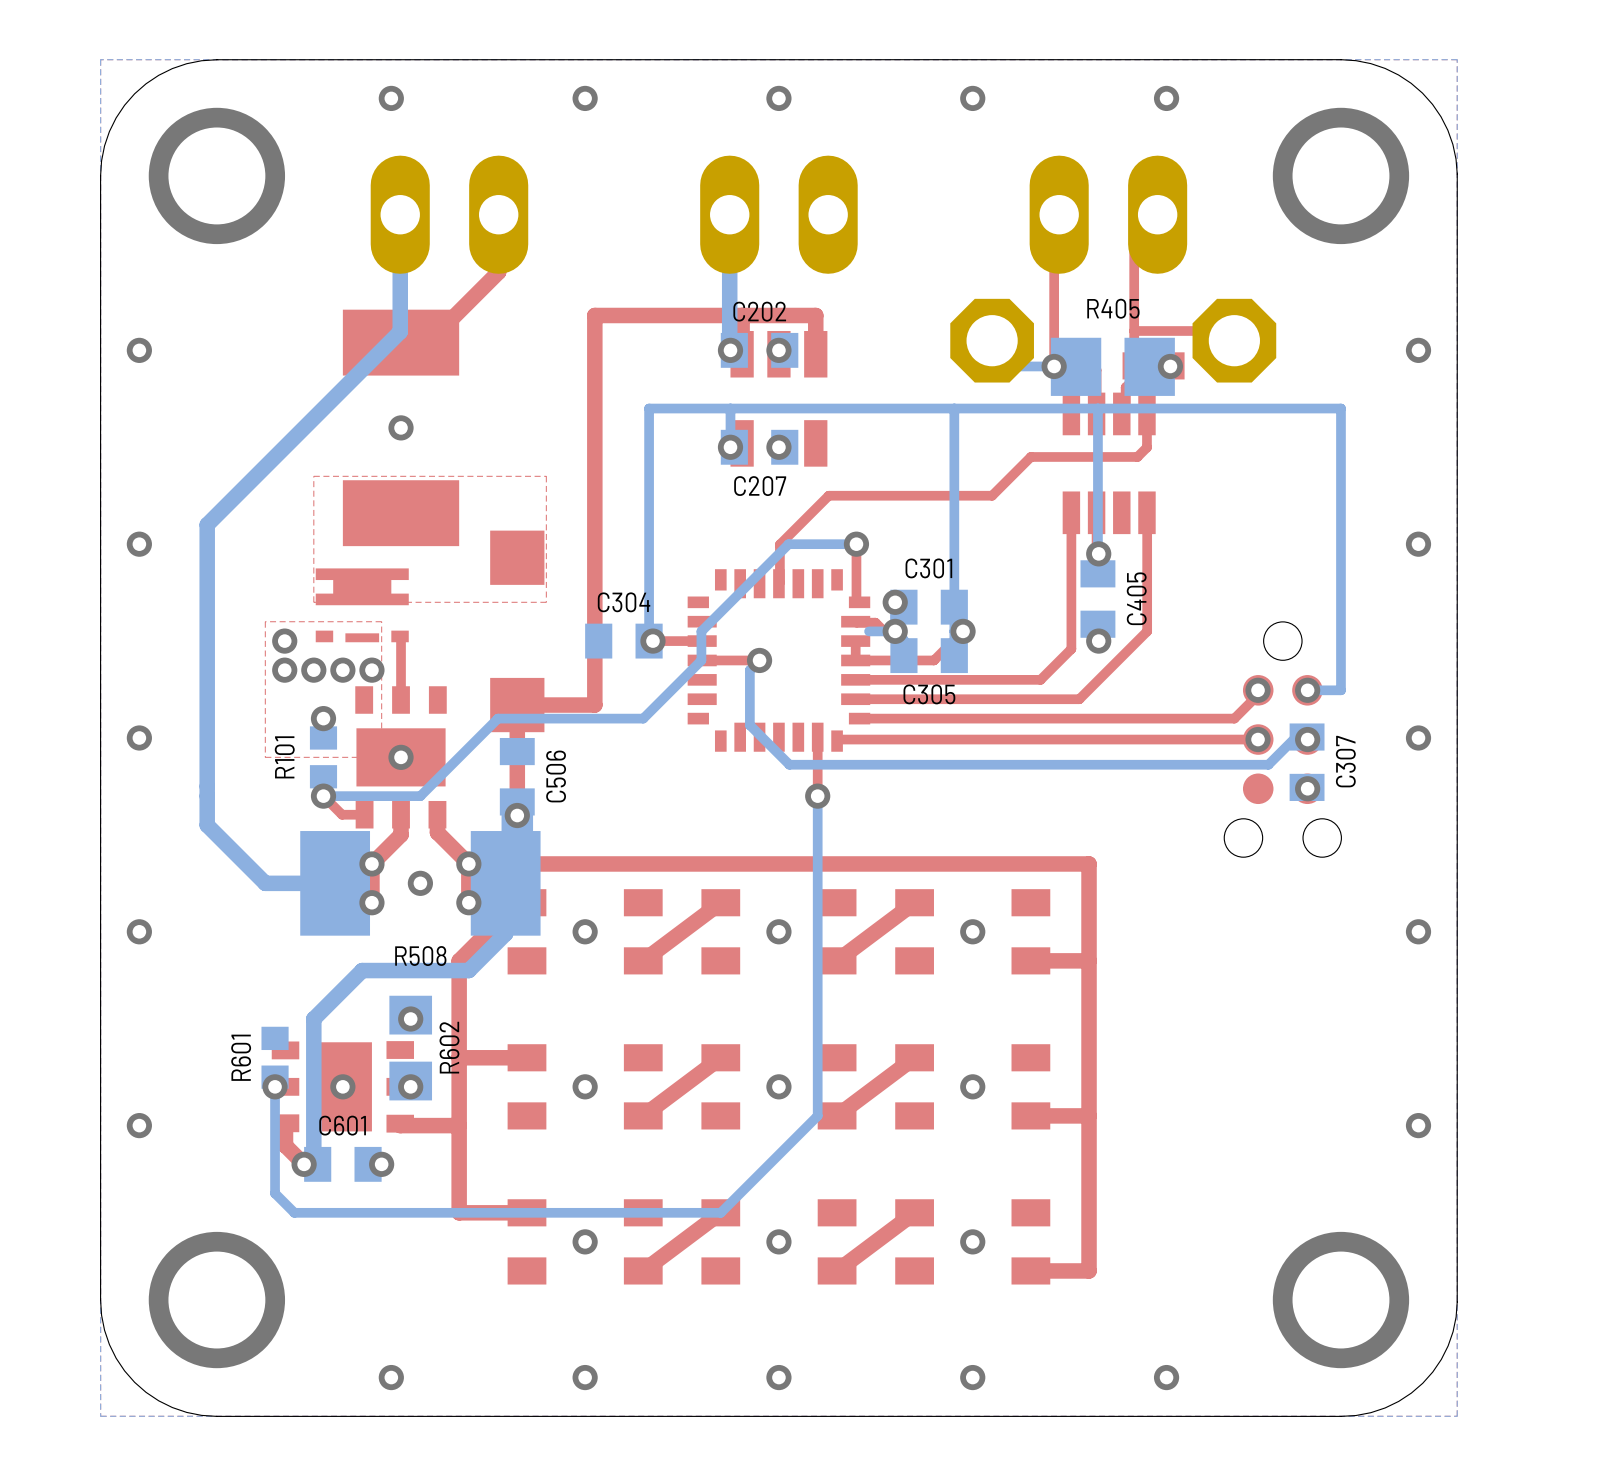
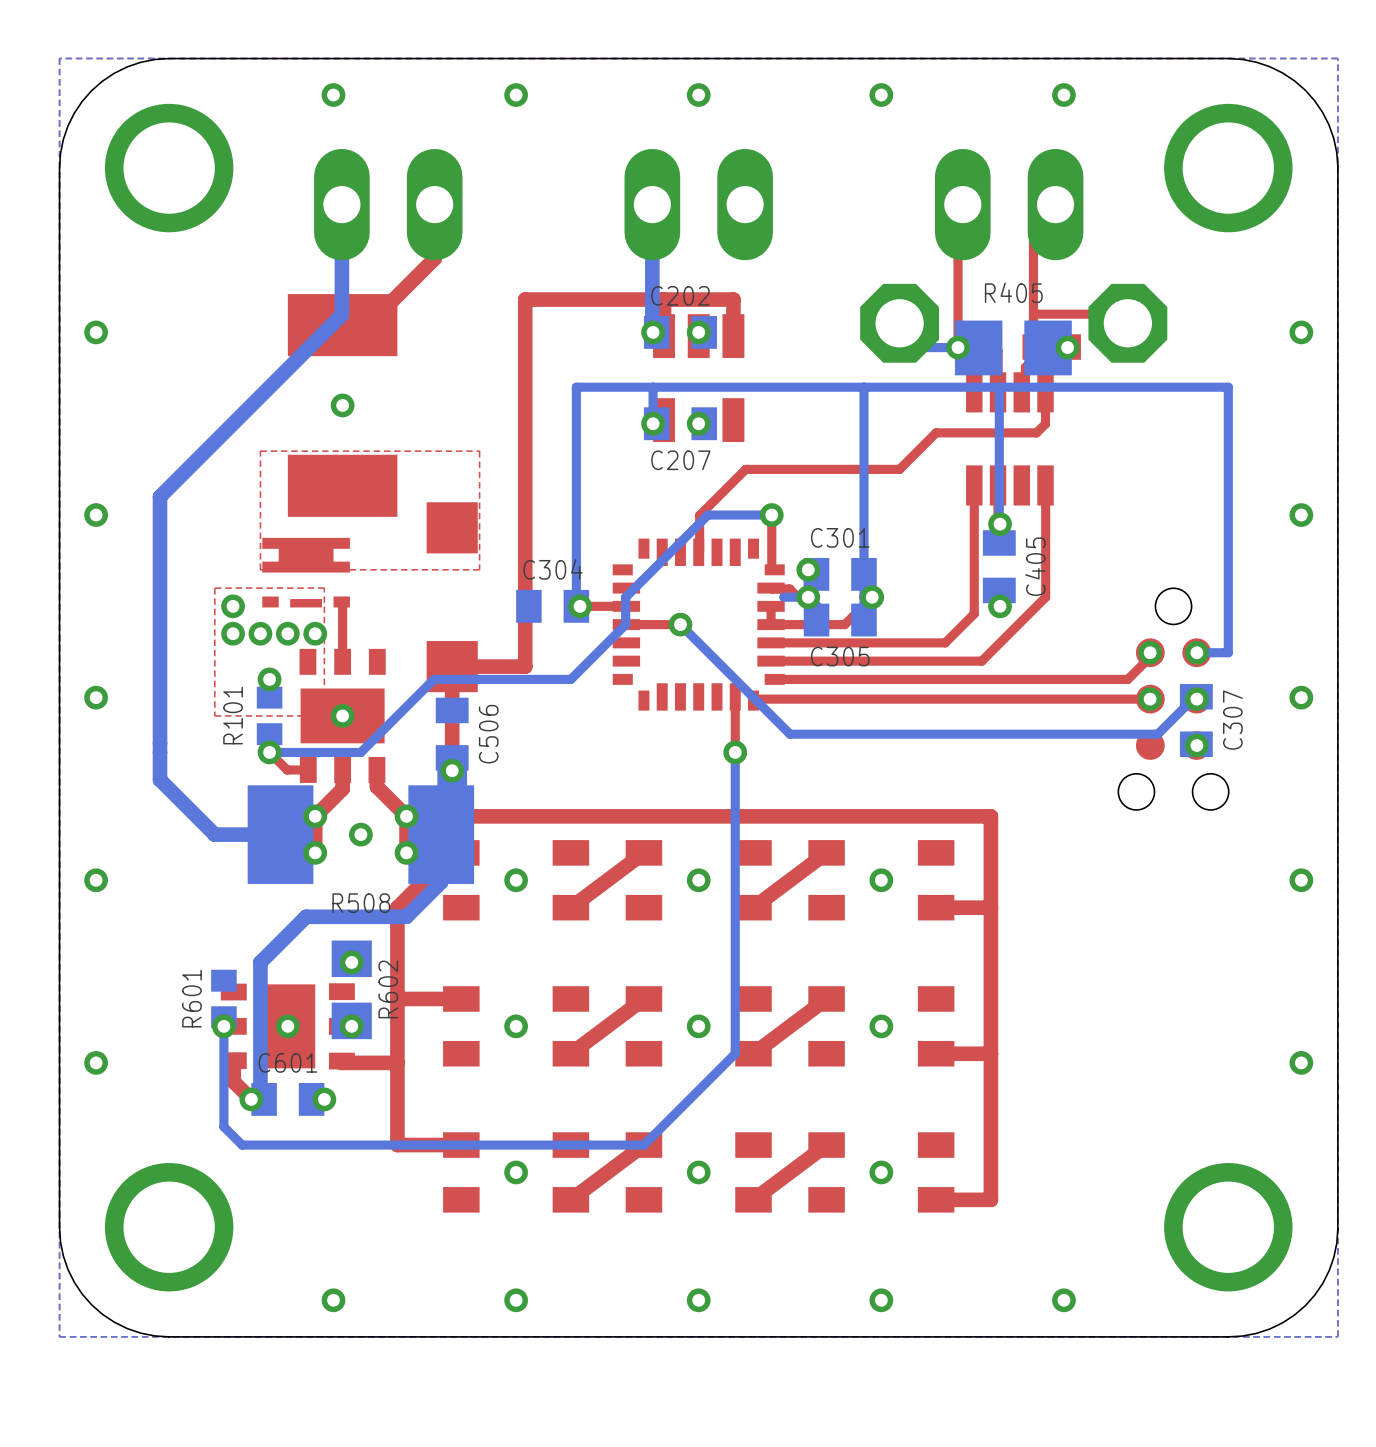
bottom track: (759, 660) (749, 670) (749, 725) (789, 764) (1268, 764) (1296, 737) (1305, 737) -> (680, 624) (790, 734) (1157, 734) (1195, 696)

